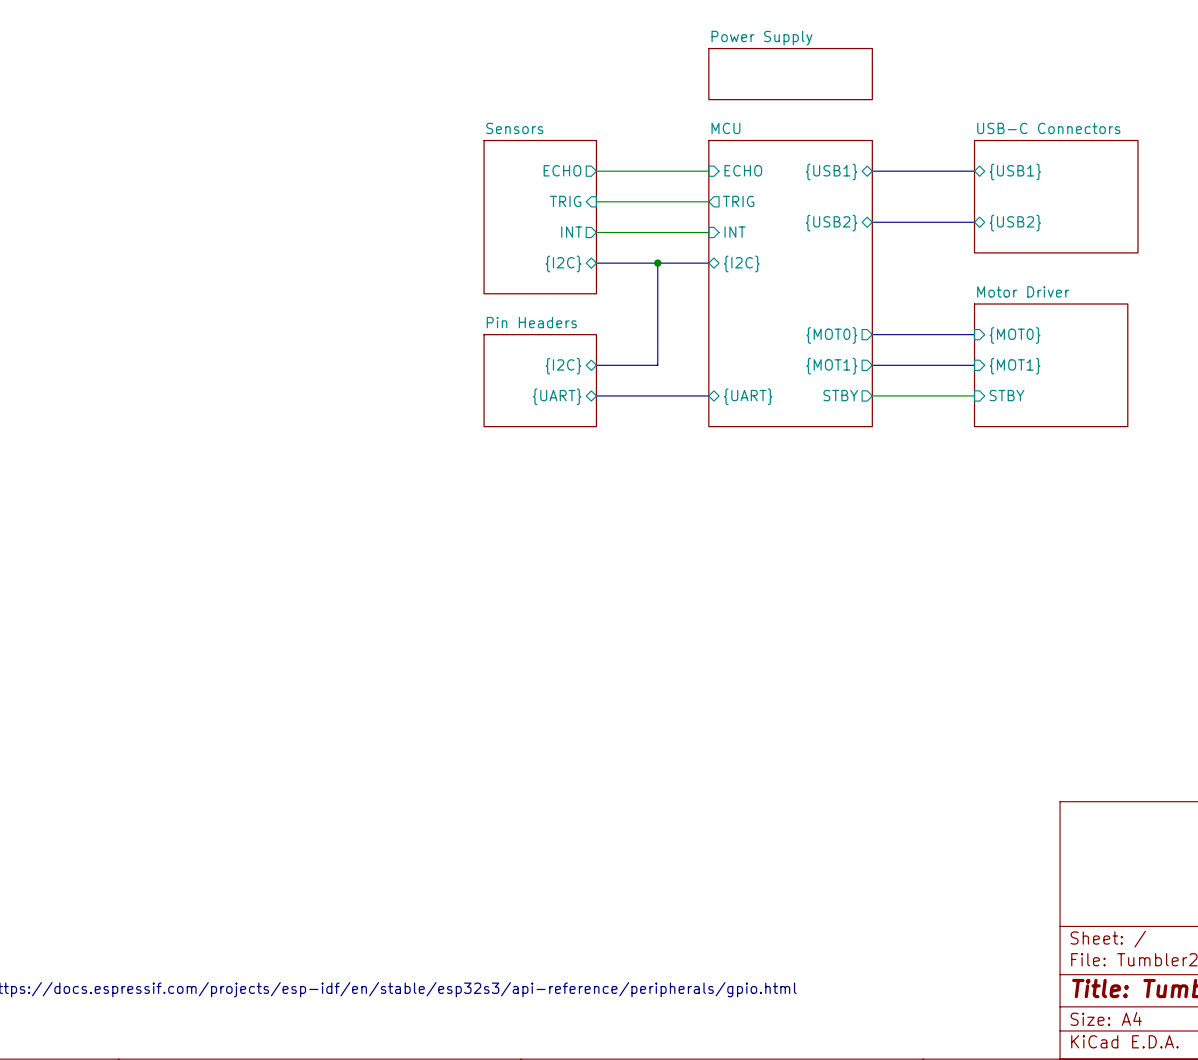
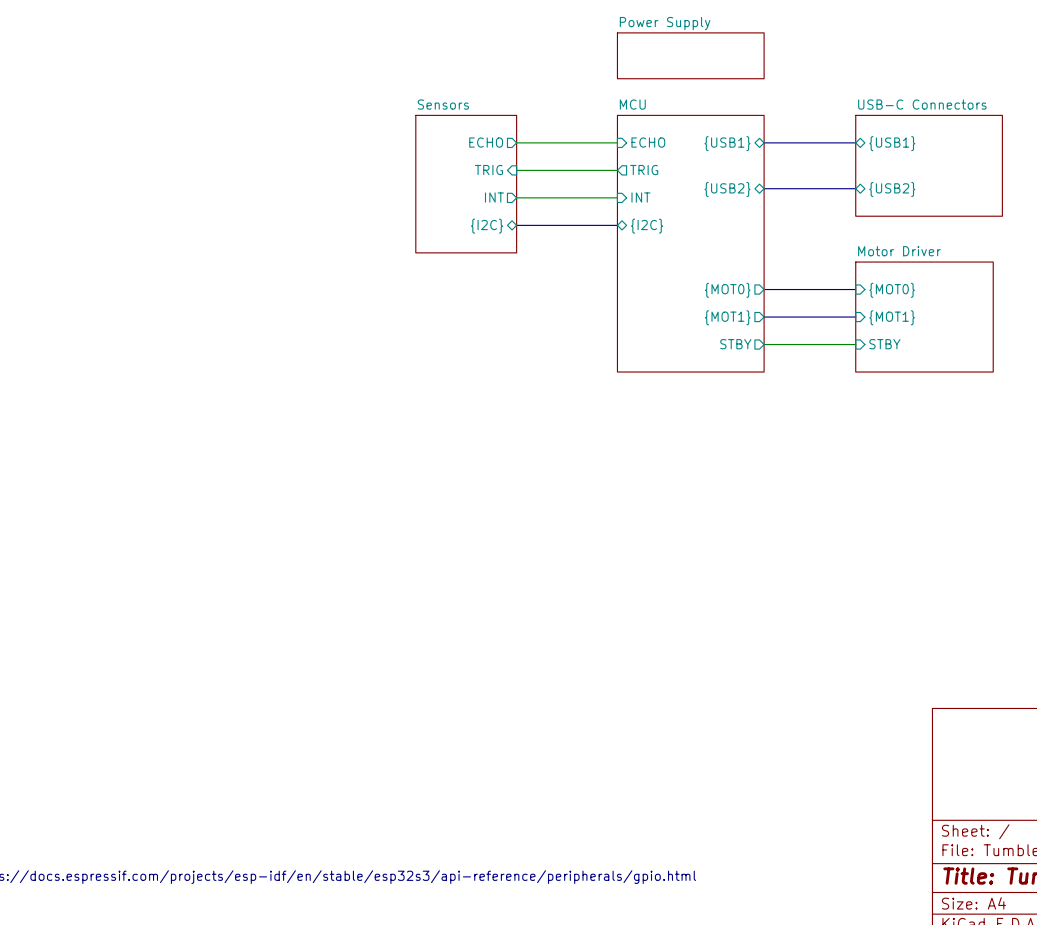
bus: (657, 263) (657, 365) (596, 365) -> none
junction: (657, 263) -> none
sheet pin: {I2C} (563, 366) -> none
sheet Pin Headers: (540, 380) -> none
bus: (596, 395) (708, 395) -> none
sheet pin: {UART} (557, 396) -> none
sheet pin: {UART} (748, 396) -> none

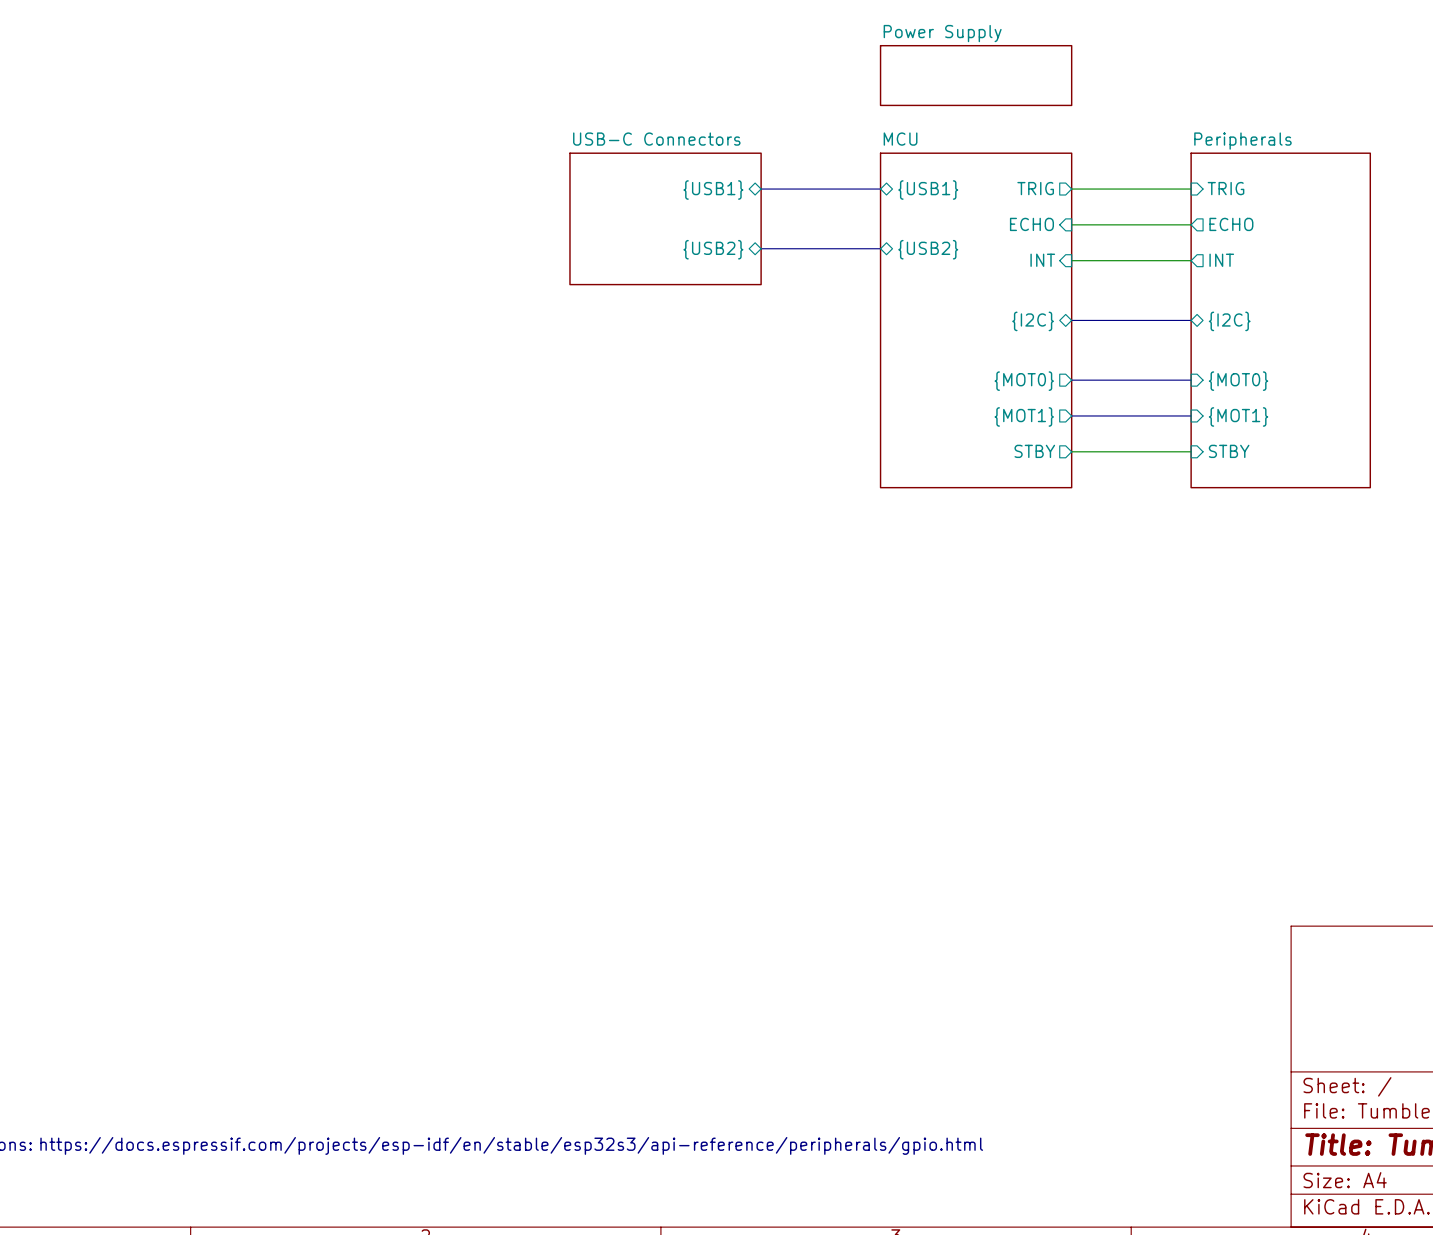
sheet pin: ECHO (486, 142) -> none
bus: none -> (761, 189) (880, 189)
sheet pin shape: input (648, 142) -> bidirectional (928, 190)
sheet pin: ECHO (648, 142) -> {USB1} (928, 190)
bus: (764, 142) (855, 142) -> none
sheet pin: none -> {USB1} (713, 190)
sheet pin shape: bidirectional (727, 143) -> output (1035, 188)
sheet pin: {USB1} (727, 143) -> TRIG (1035, 188)
sheet pin shape: bidirectional (892, 143) -> input (1226, 188)
sheet pin: {USB1} (892, 143) -> TRIG (1226, 188)
sheet USB-C Connectors: none -> (665, 218)
sheet USB-C Connectors: (929, 165) -> none
sheet pin: TRIG (488, 170) -> none
wire: (516, 170) (617, 170) -> none
sheet pin: TRIG (644, 170) -> none
sheet pin: none -> ECHO (1031, 224)
wire: none -> (1071, 224) (1191, 224)
sheet pin: none -> ECHO (1231, 224)
sheet Sensors: (466, 184) -> none
bus: none -> (761, 248) (880, 248)
bus: (764, 188) (855, 188) -> (1071, 320) (1191, 320)
sheet pin: none -> {USB2} (713, 249)
sheet pin: none -> {USB2} (928, 249)
sheet pin: {USB2} (727, 189) -> none
sheet pin: {USB2} (892, 189) -> none
sheet pin: INT (494, 197) -> none
wire: (516, 197) (617, 197) -> none
sheet pin: INT (640, 197) -> none
sheet pin: none -> INT (1042, 260)
wire: none -> (1071, 260) (1191, 260)
sheet pin: none -> INT (1221, 260)
bus: (516, 225) (617, 225) -> none
sheet pin: {I2C} (487, 226) -> none
sheet pin: {I2C} (647, 226) -> none
sheet Peripherals: none -> (1280, 320)
sheet pin: none -> {I2C} (1033, 321)
sheet pin: none -> {I2C} (1229, 321)
sheet Motor Driver: (924, 317) -> none

